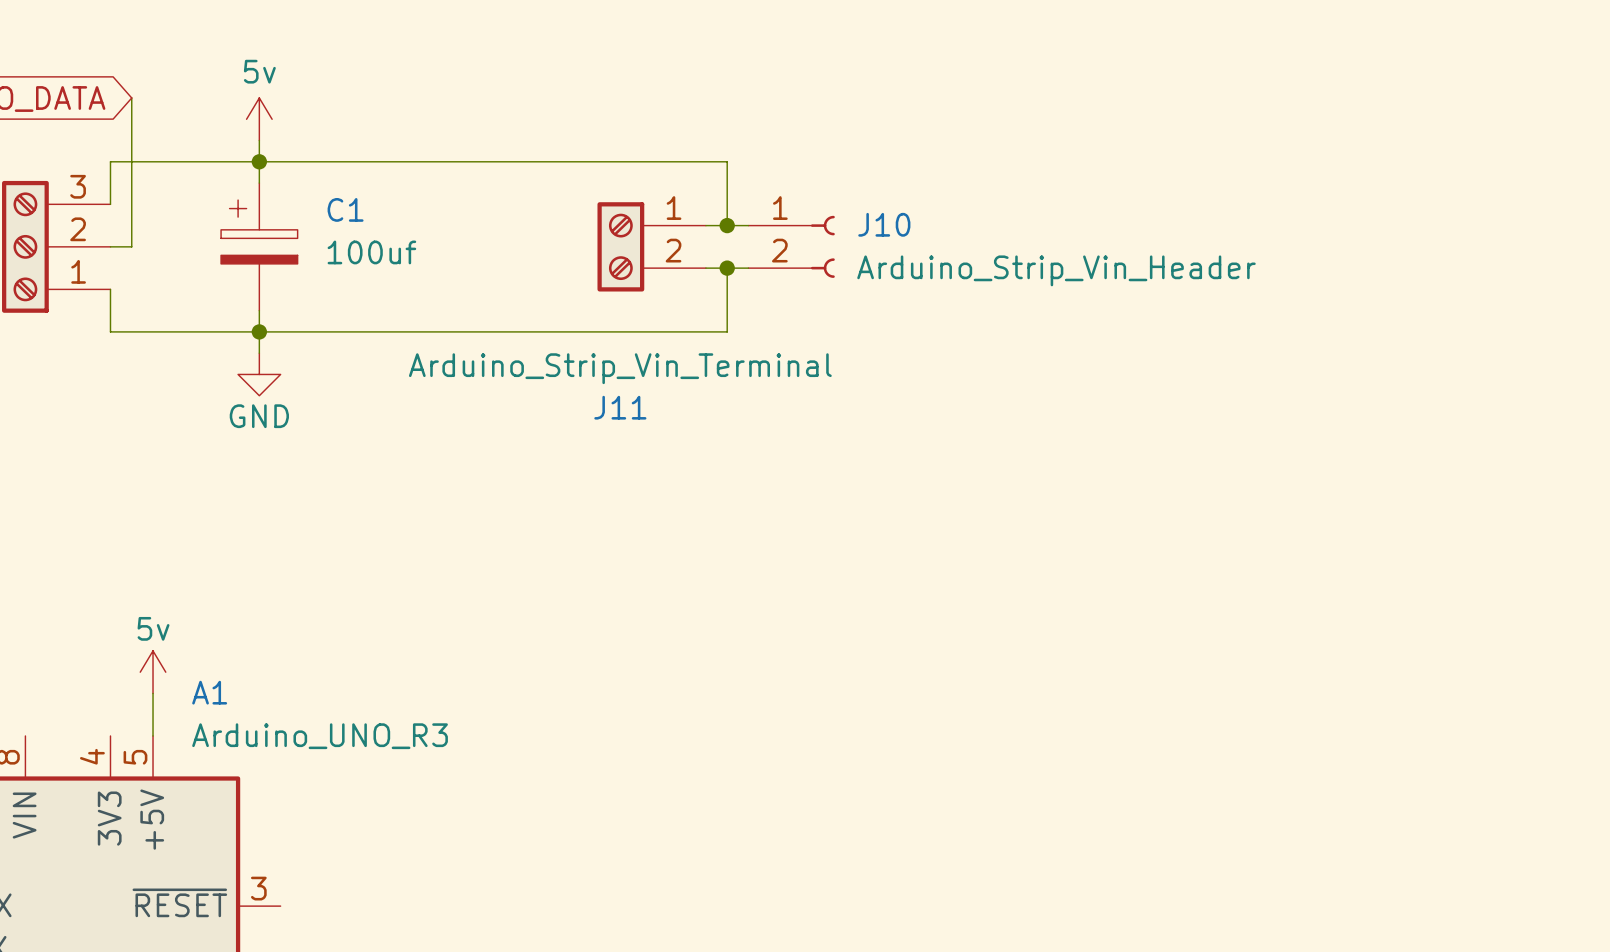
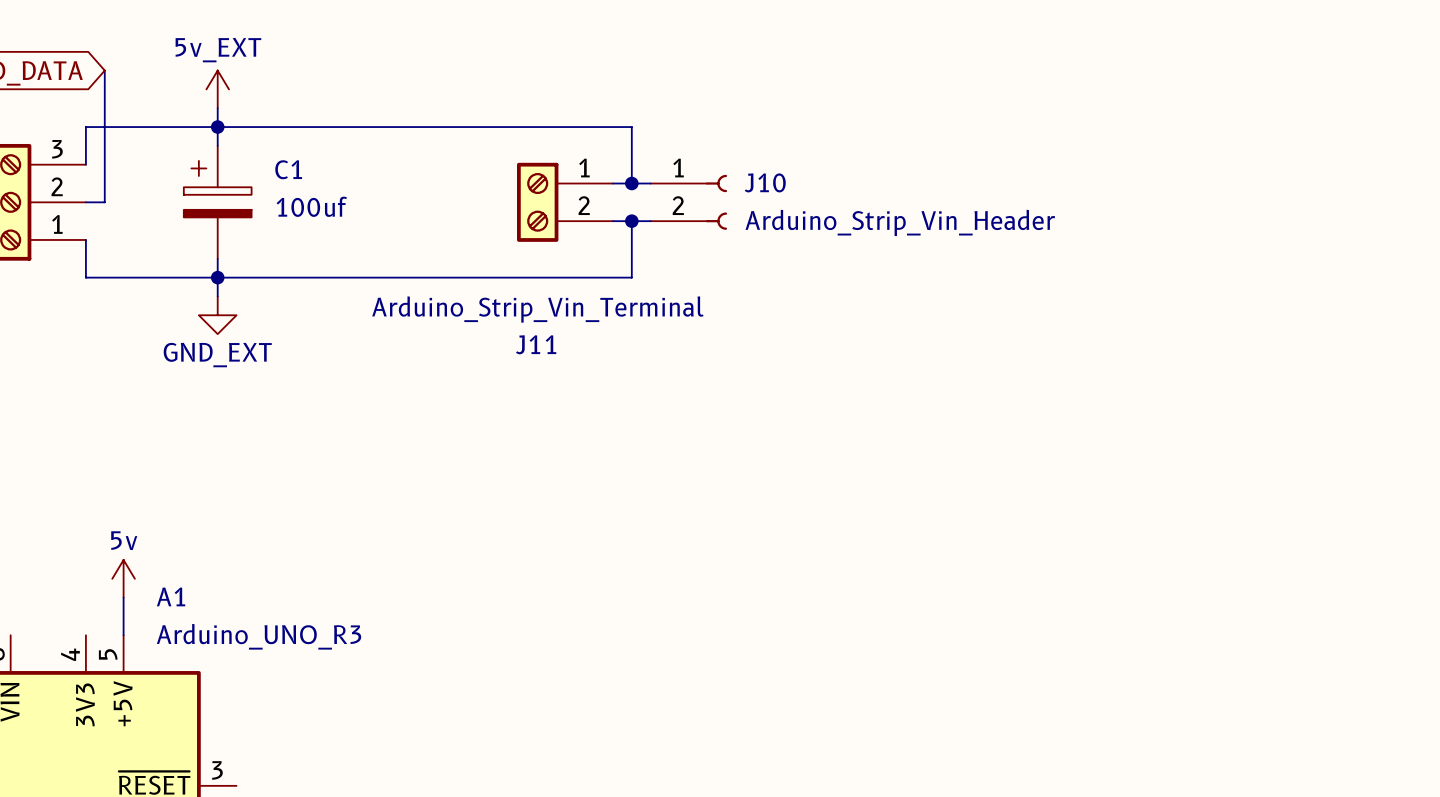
power symbol: 5v (259, 119) -> 5v_EXT (217, 89)
power symbol: GND (259, 374) -> GND_EXT (217, 315)

